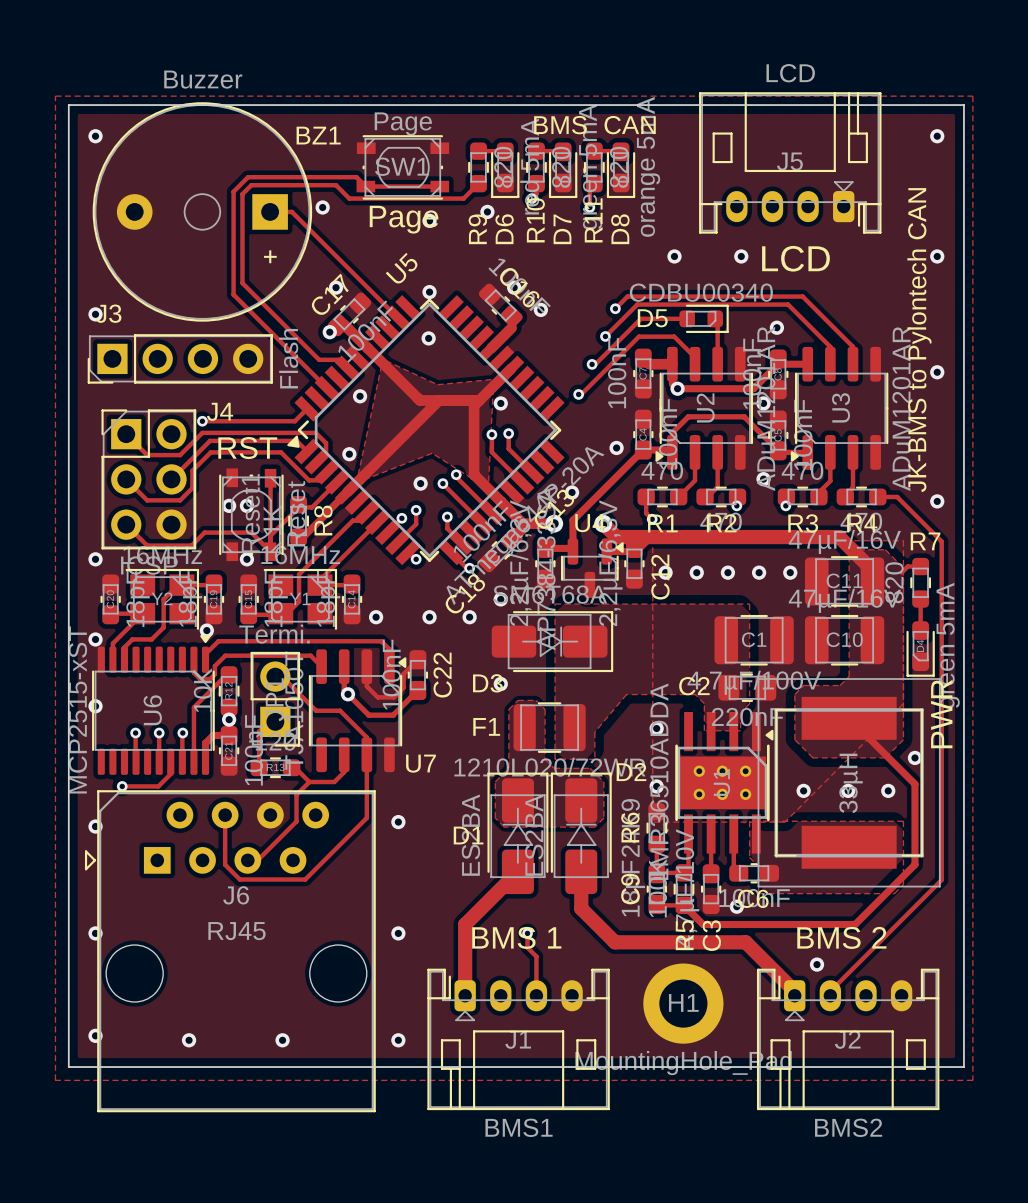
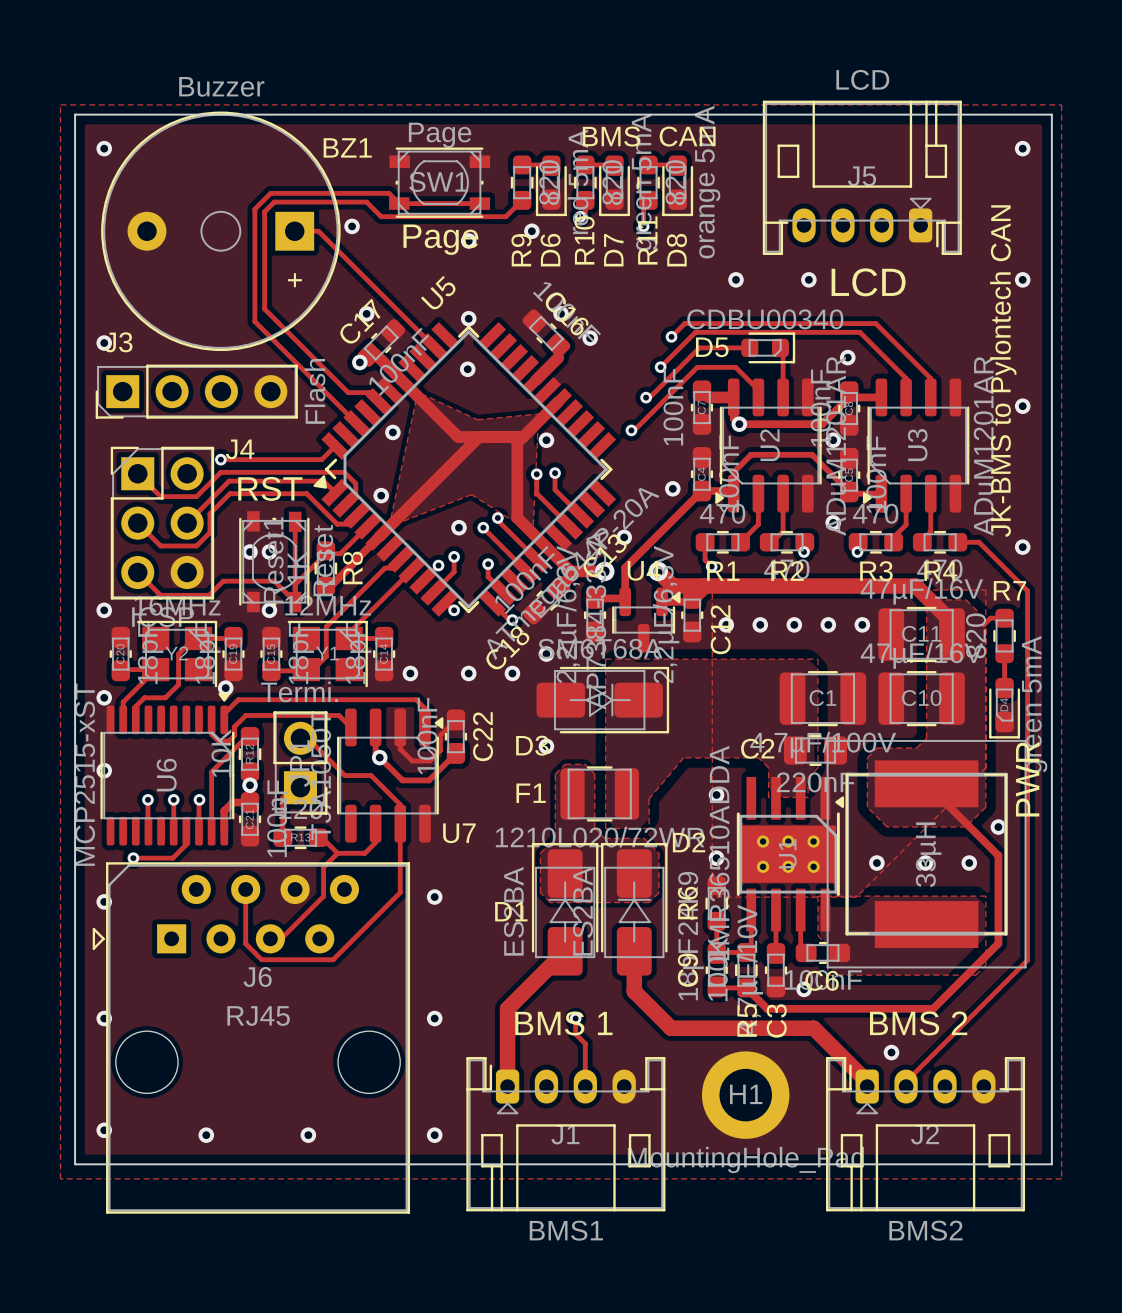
Y1 value: 16MHz (300, 555) -> 12MHz (328, 605)

